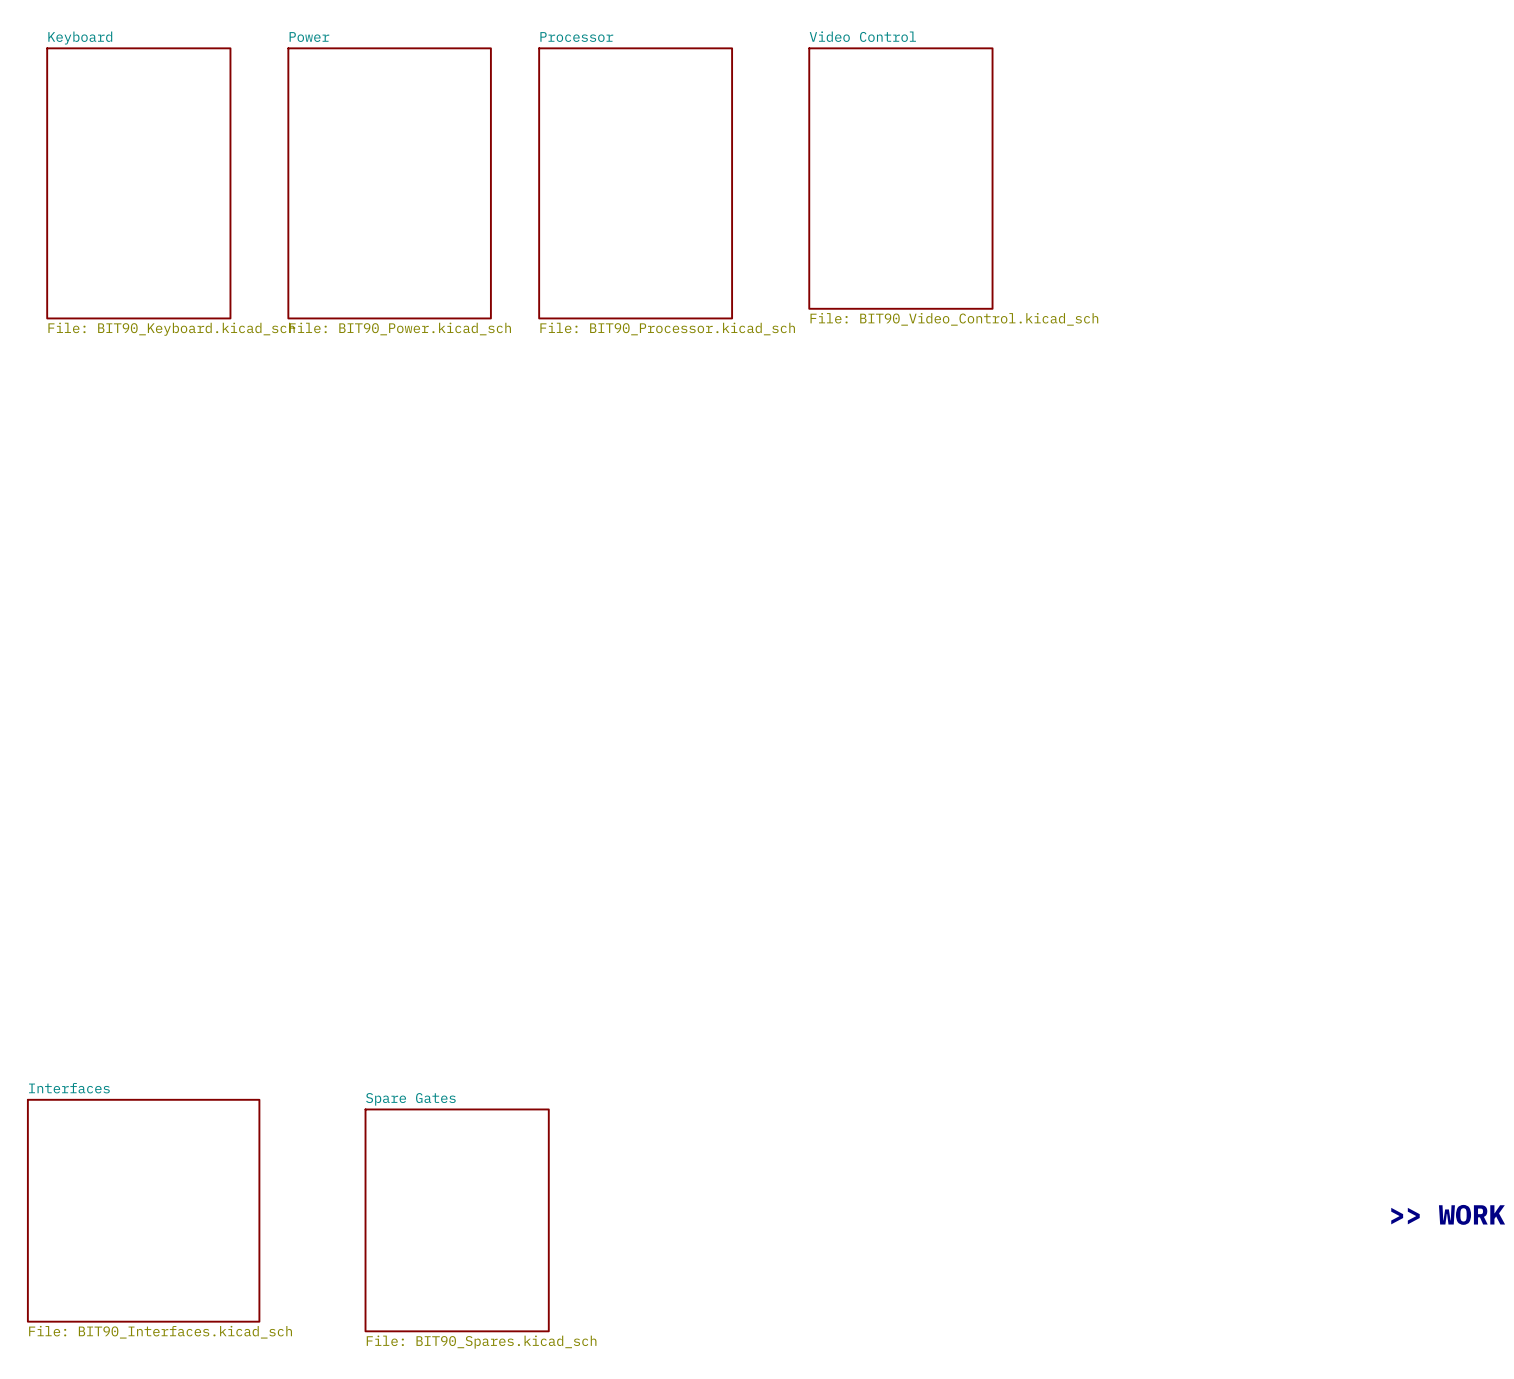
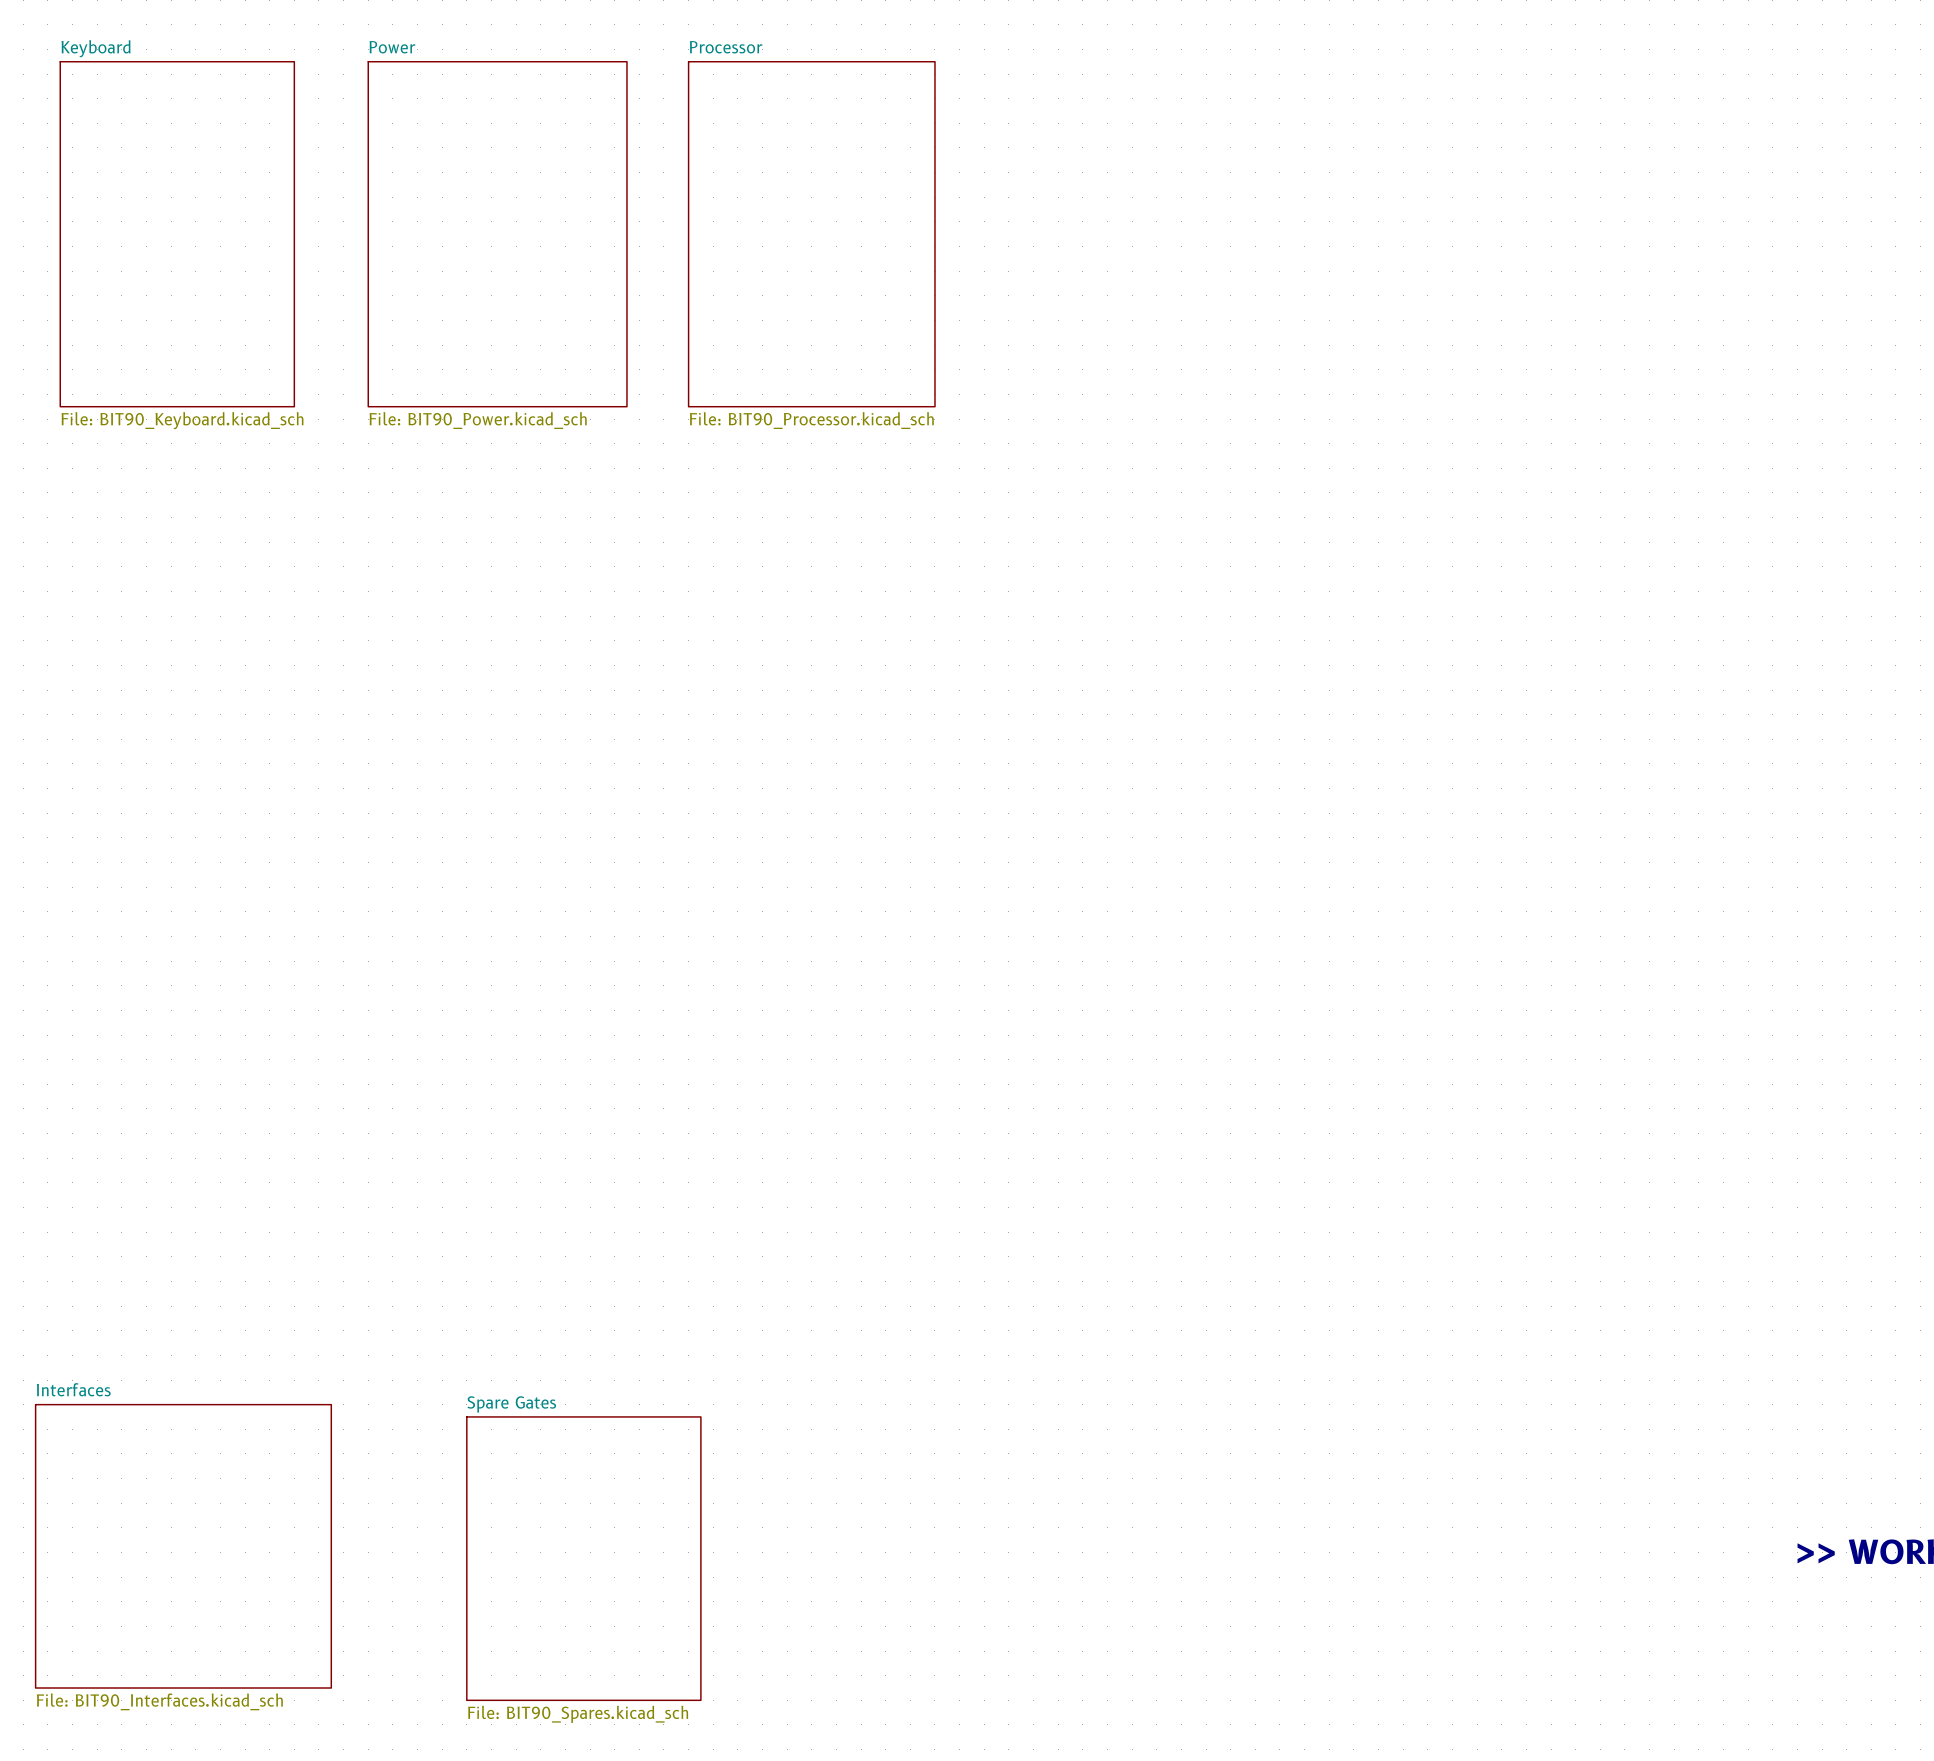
sheet Video Control: File: BIT90_Video_Control.kicad_sch (900, 178) -> none

